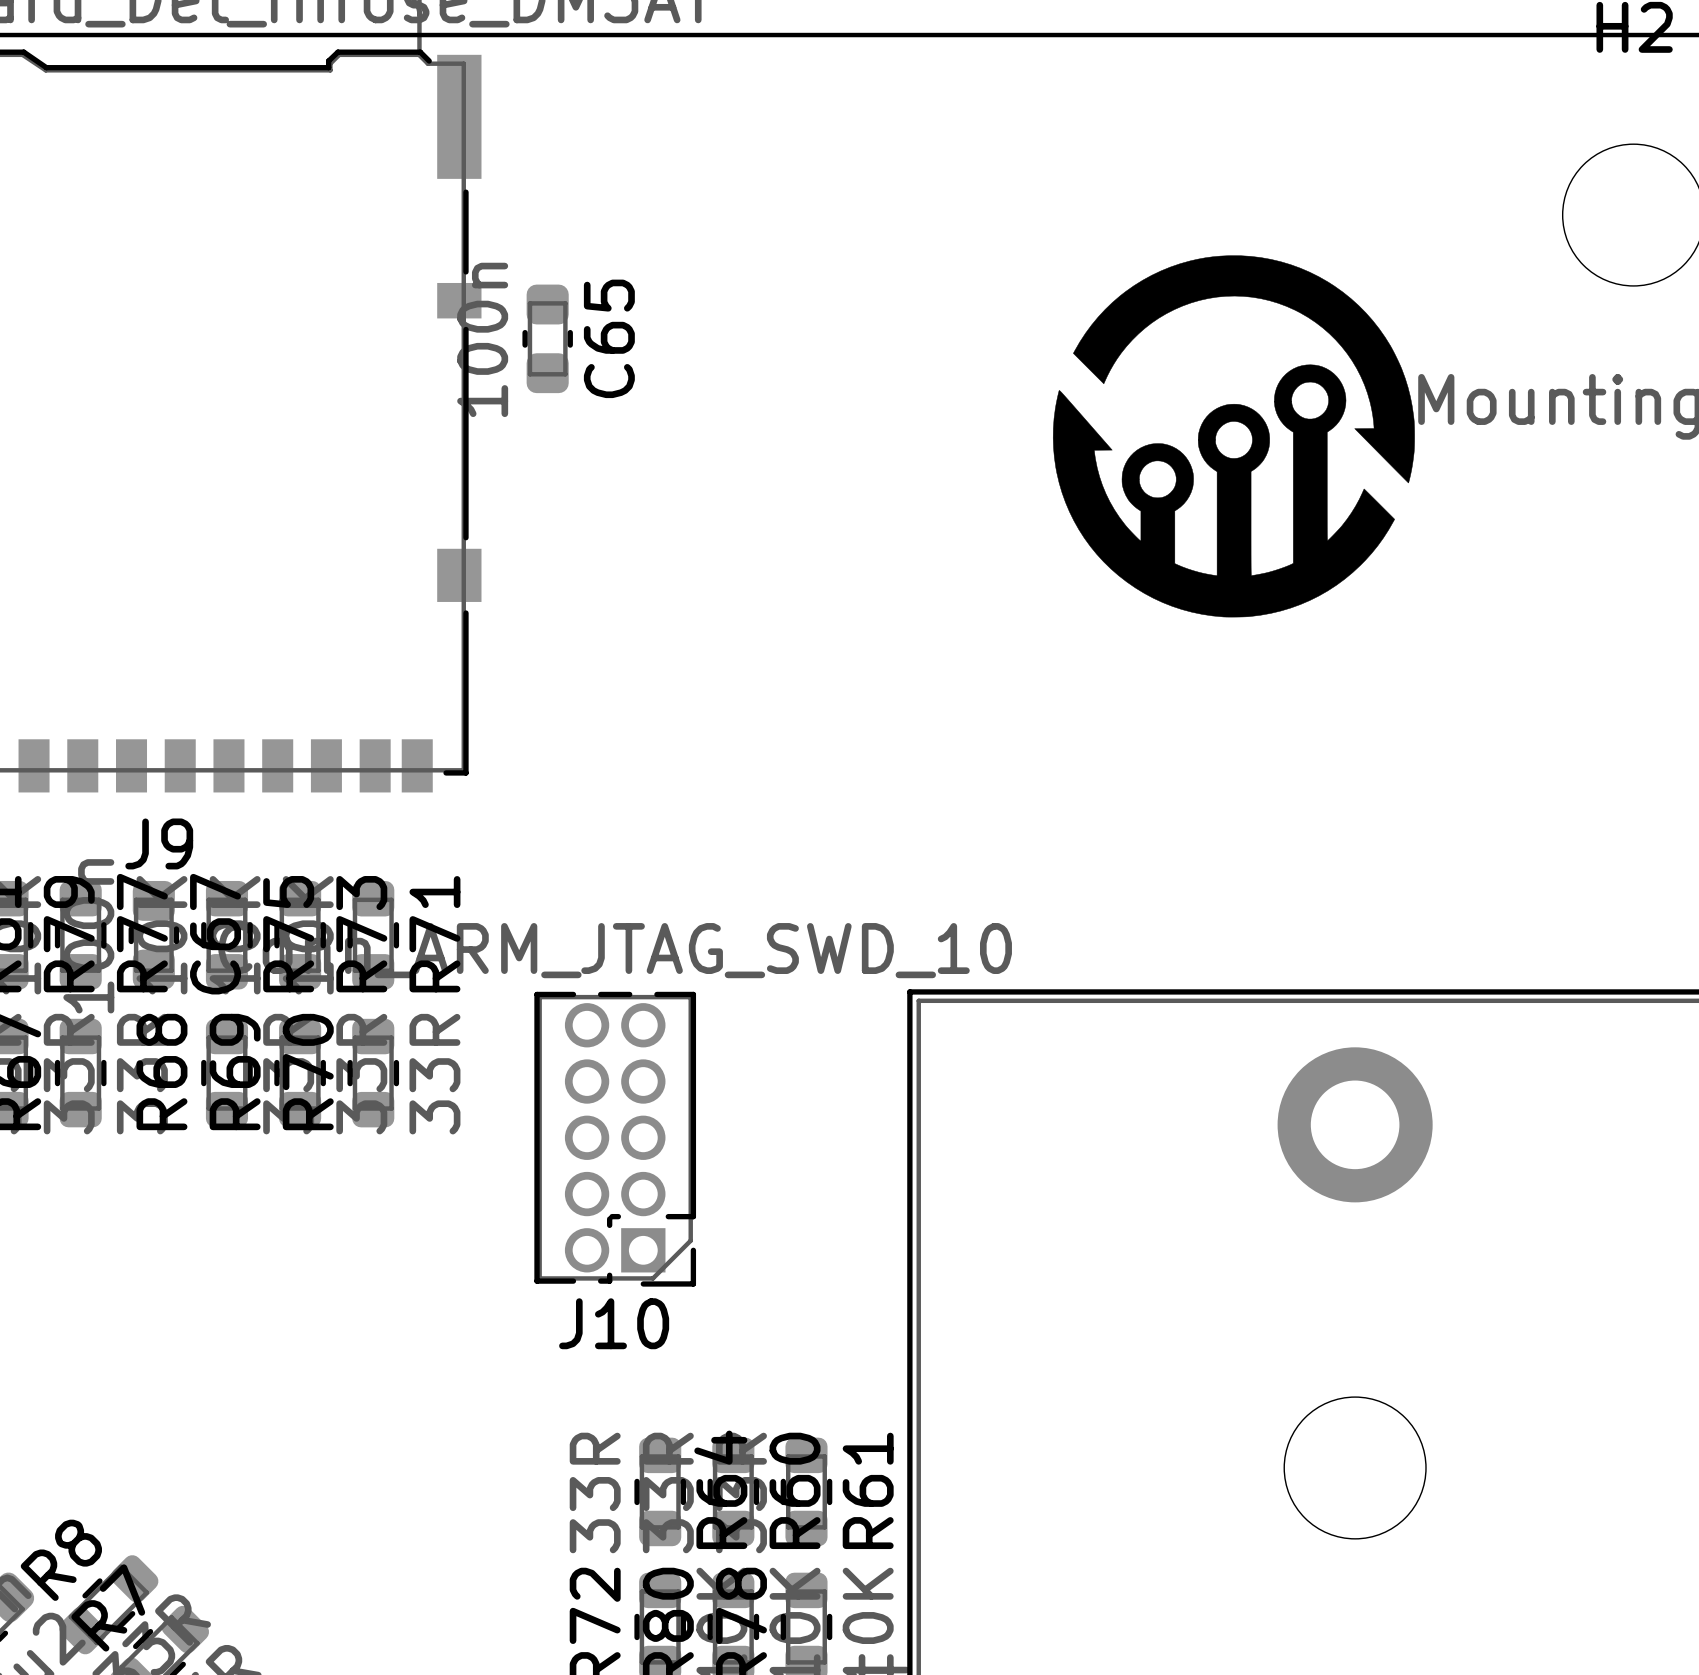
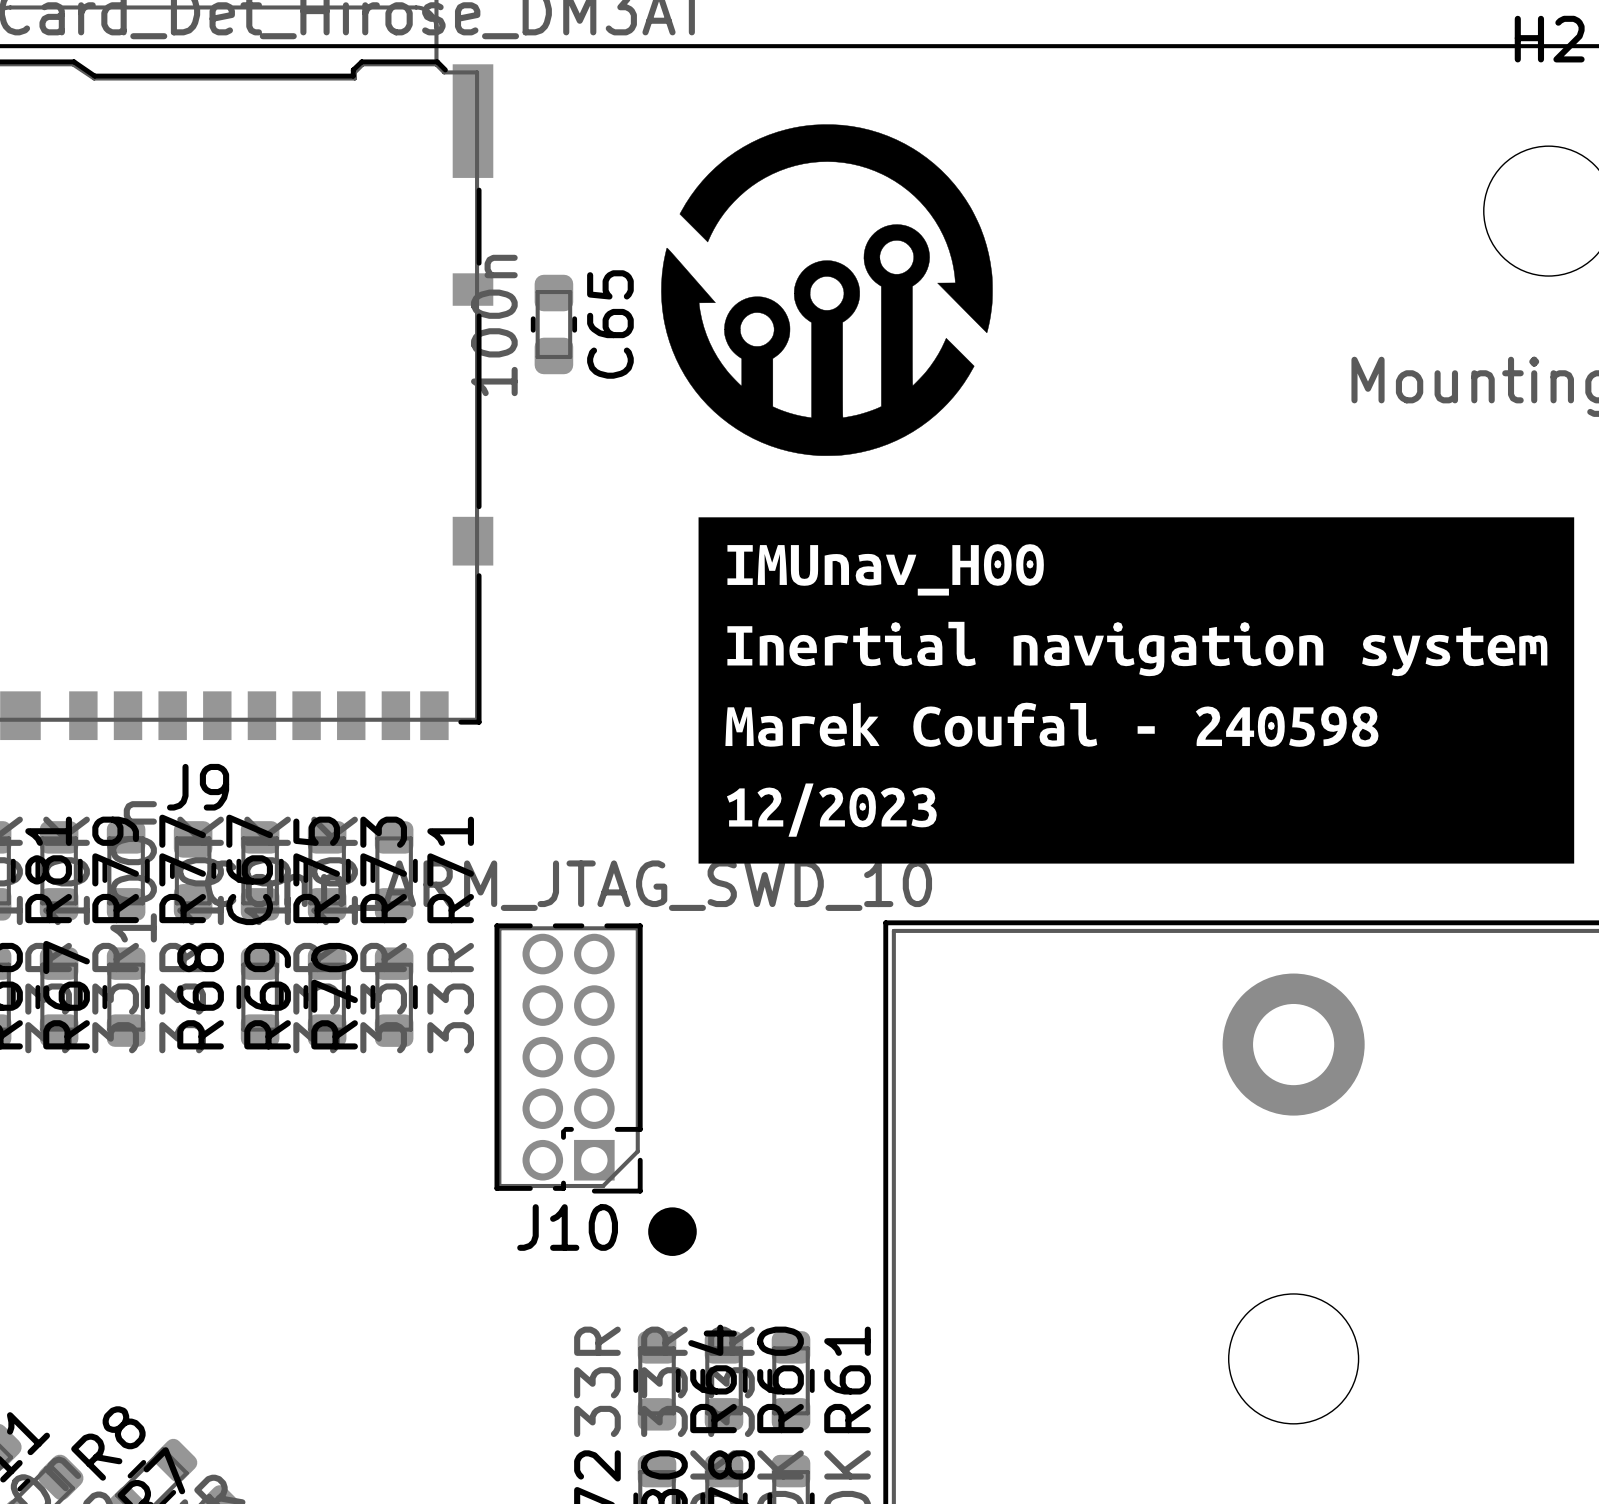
drawing position: (1233, 436) -> (826, 290)
drawing: none -> [698, 517, 1575, 864]
J10 position: (615, 1139) -> (568, 1058)
drawing: none -> [648, 1207, 697, 1256]

